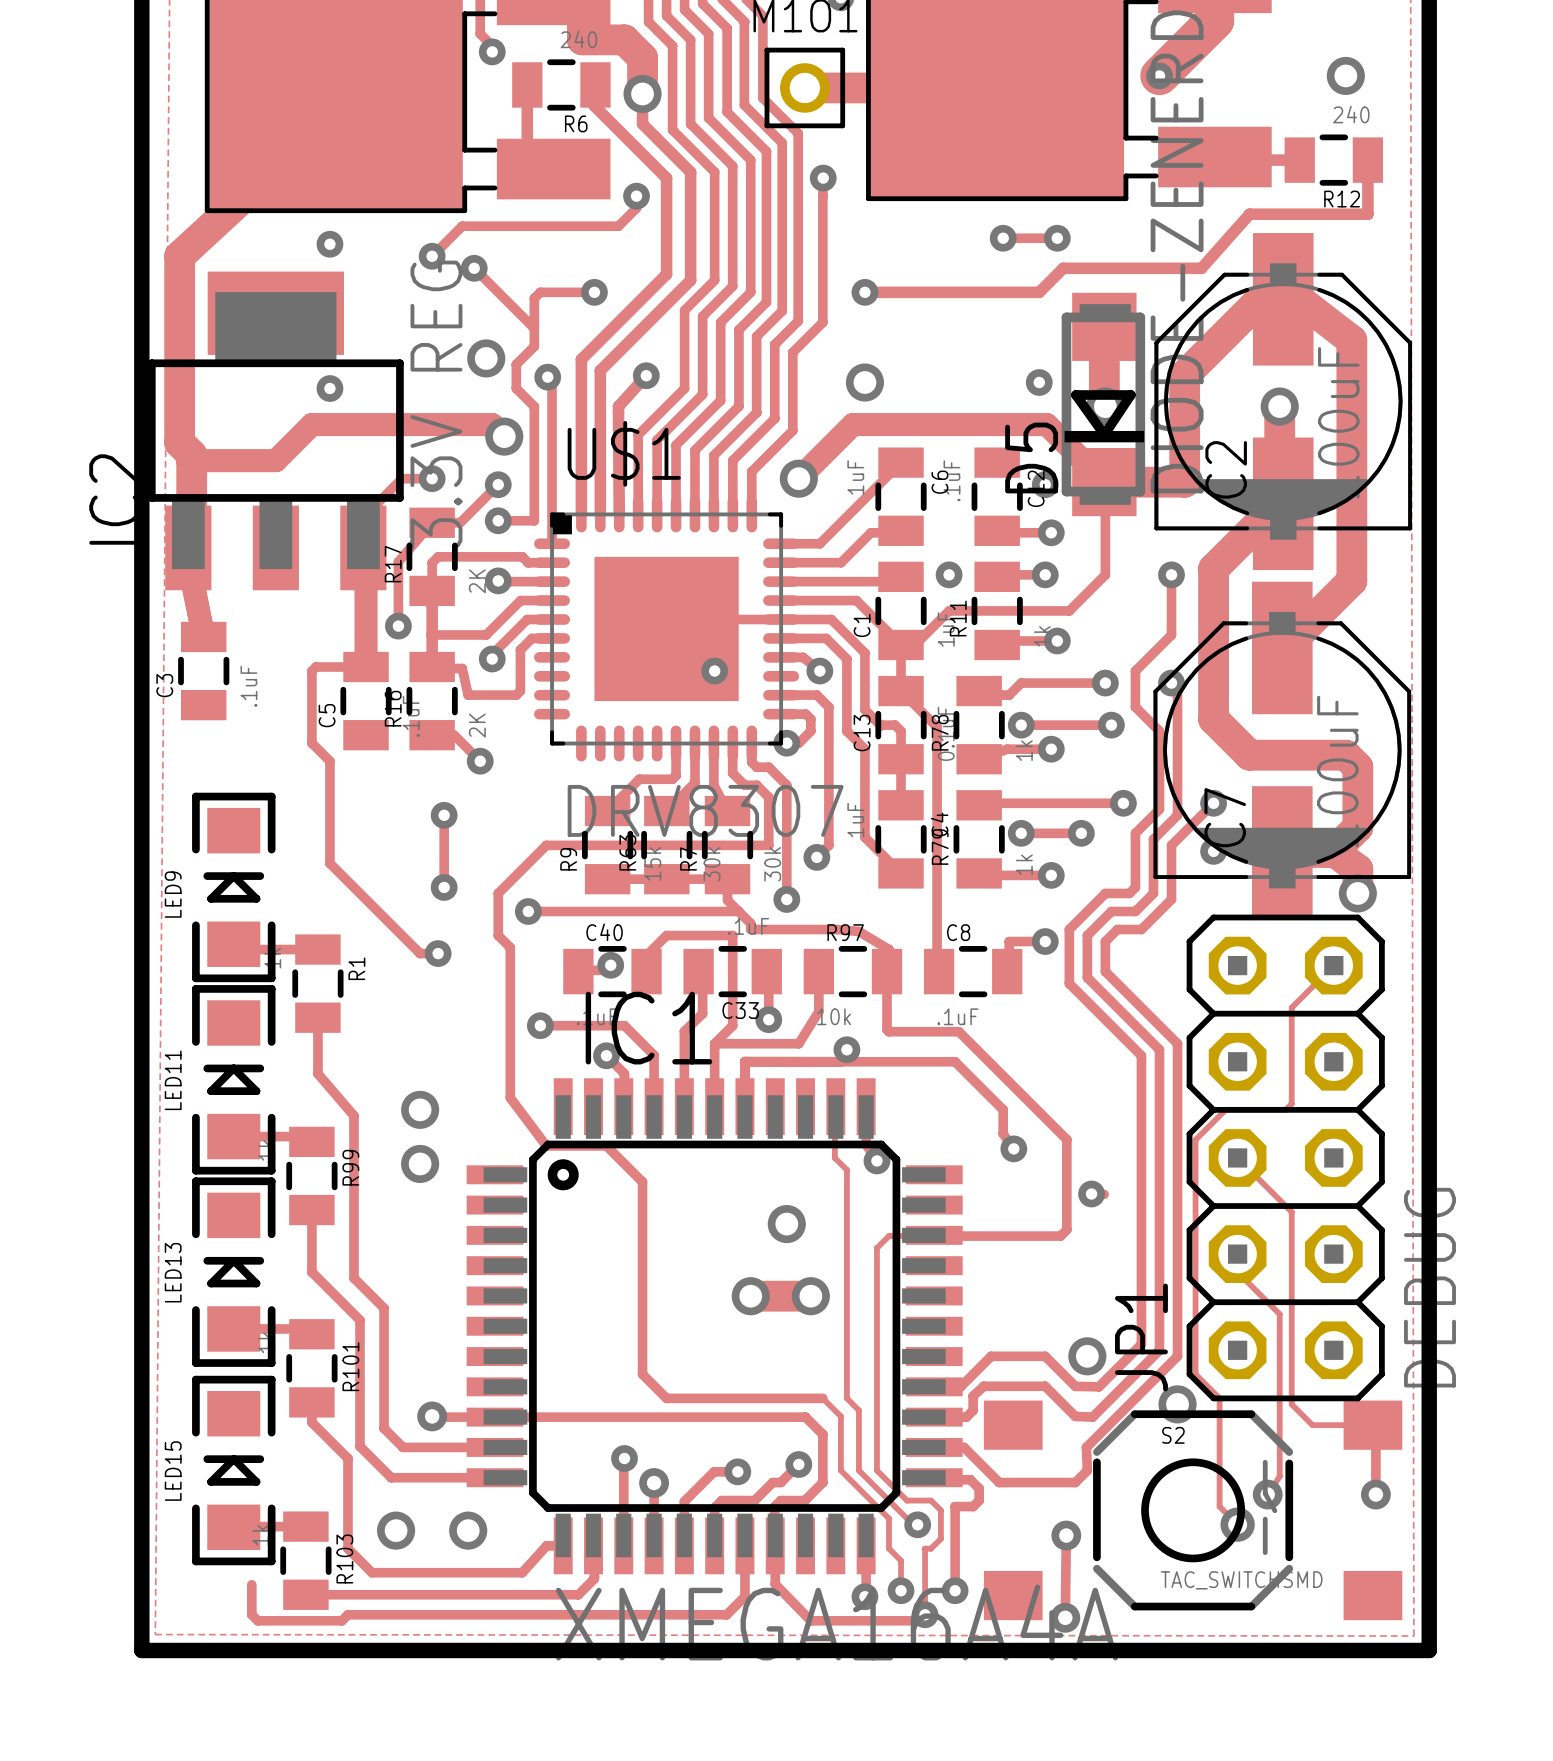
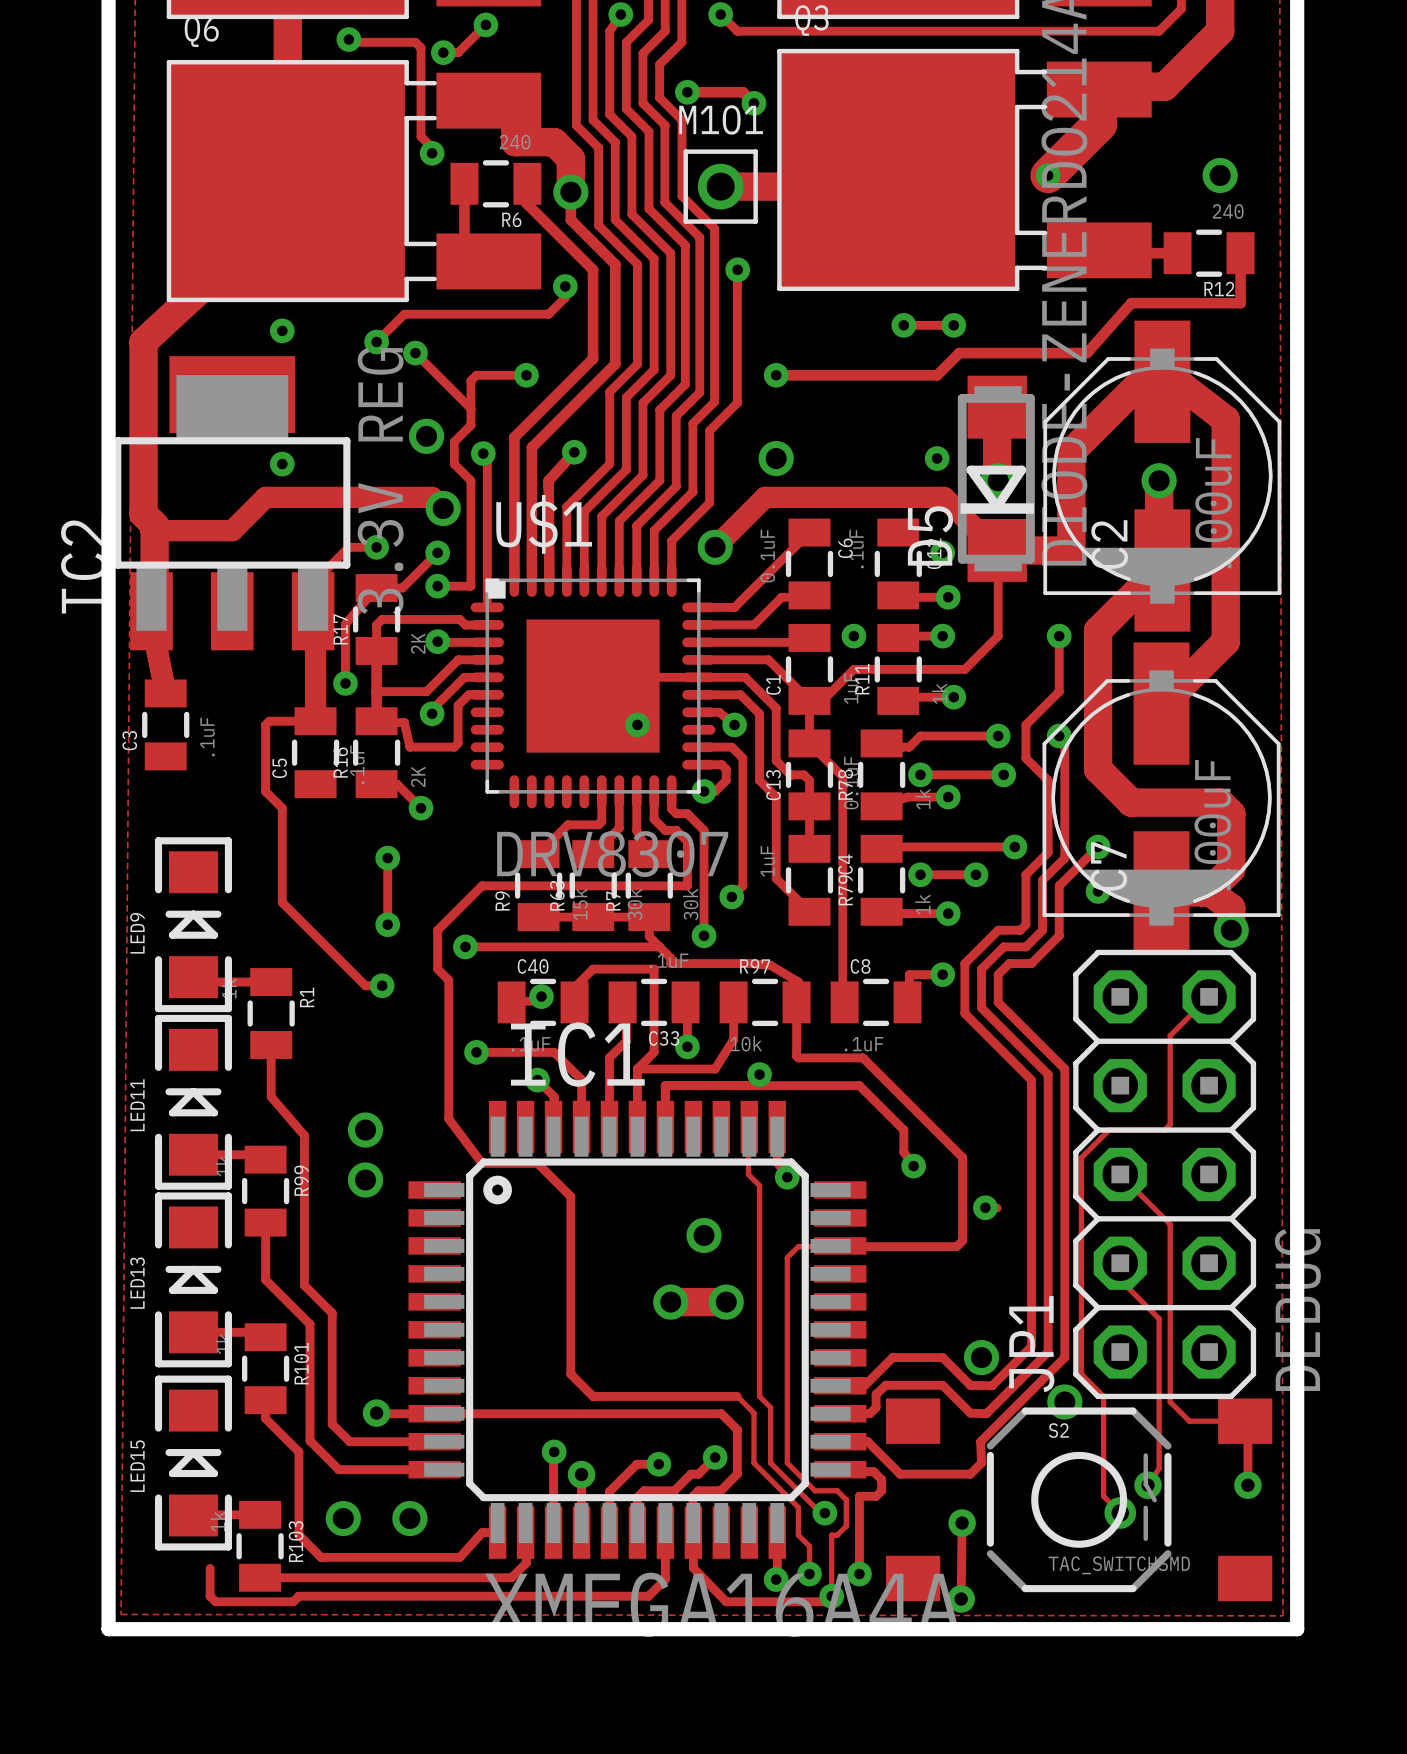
C6 value: 1uF (855, 477) -> 0.1uF (767, 556)

